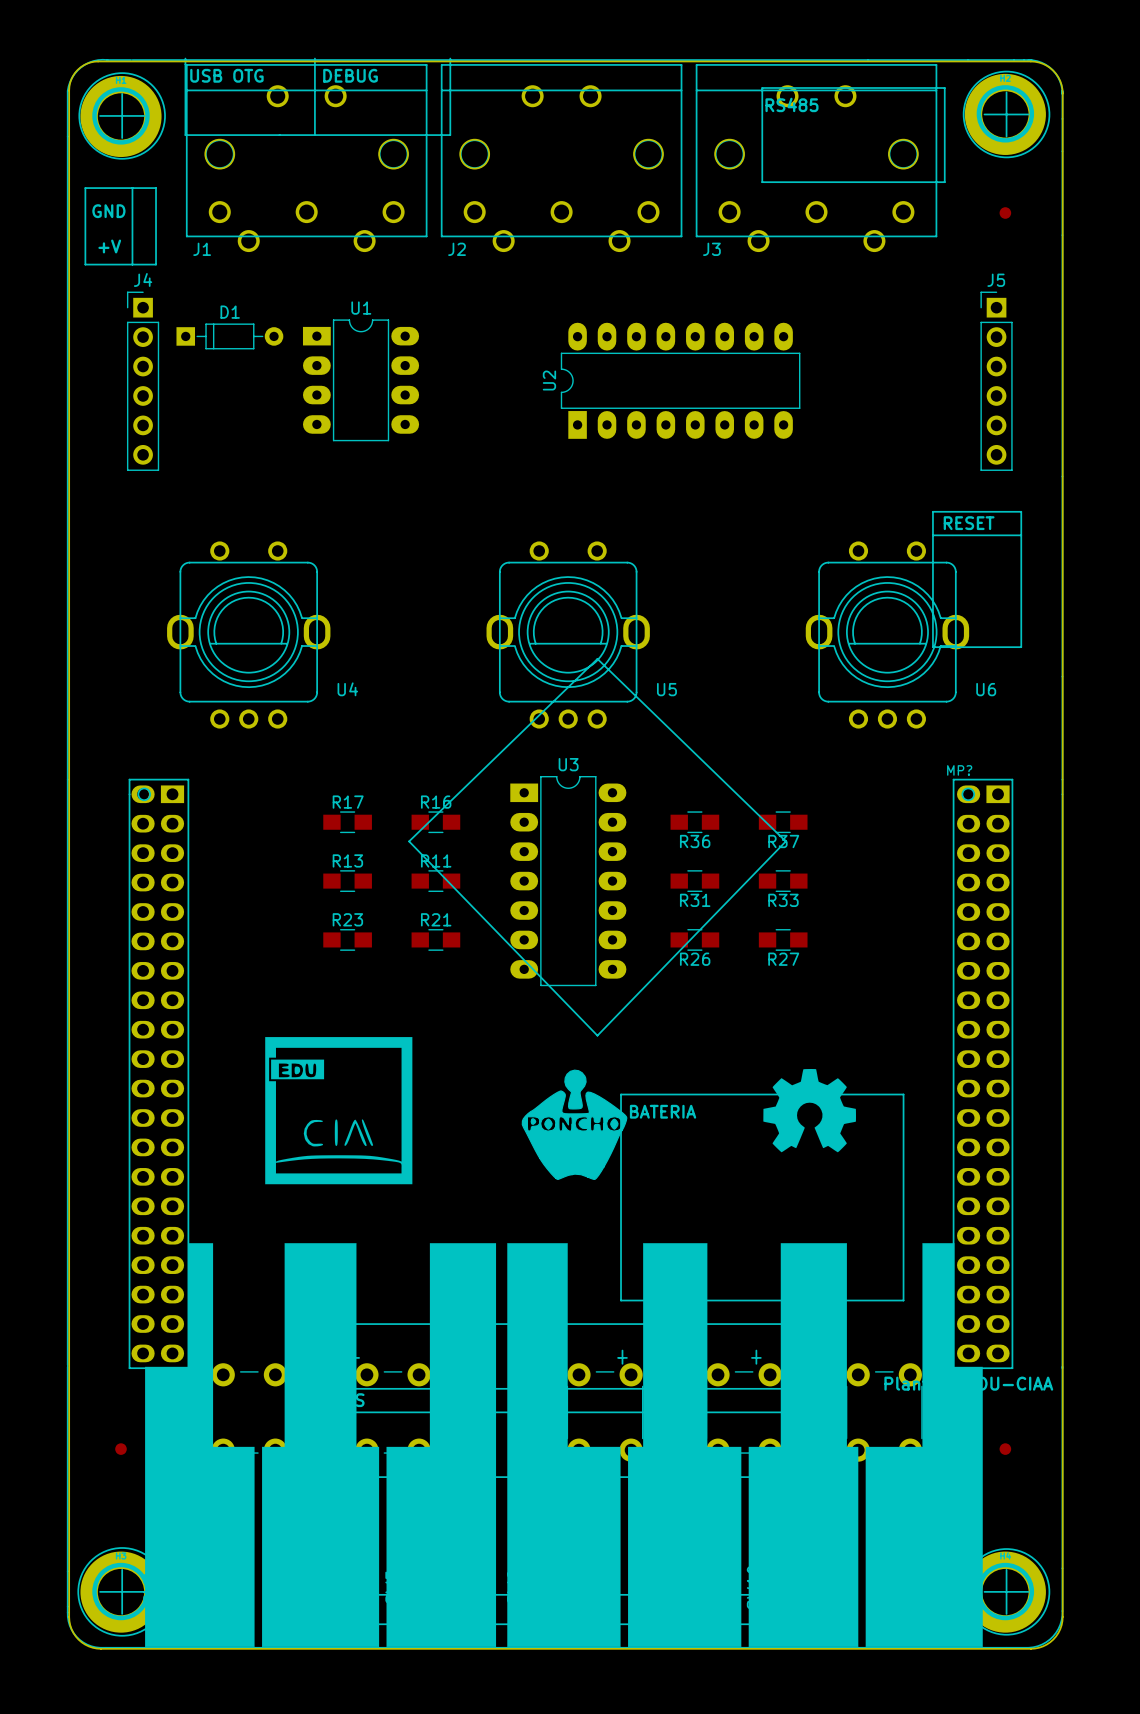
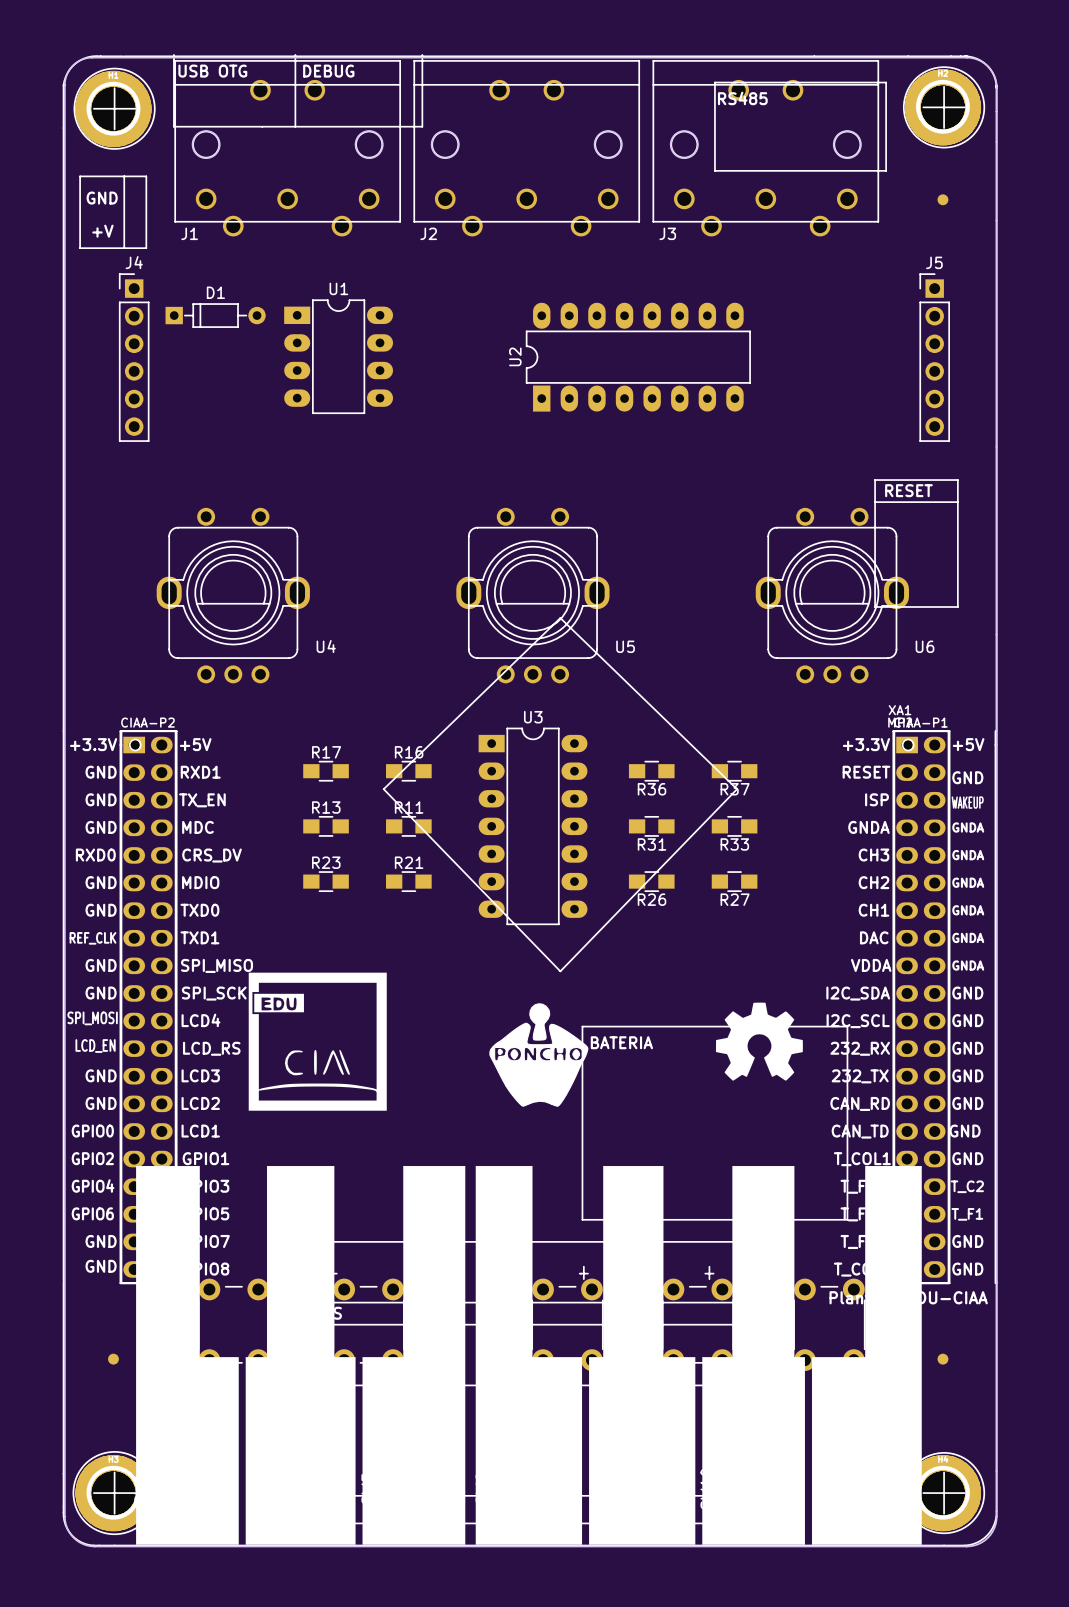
XA1: none -> (535, 800)
part: (157, 1073) -> none
part: (983, 1073) -> none
drawing shape: [145, 1243, 983, 1647] -> [136, 1165, 922, 1545]

